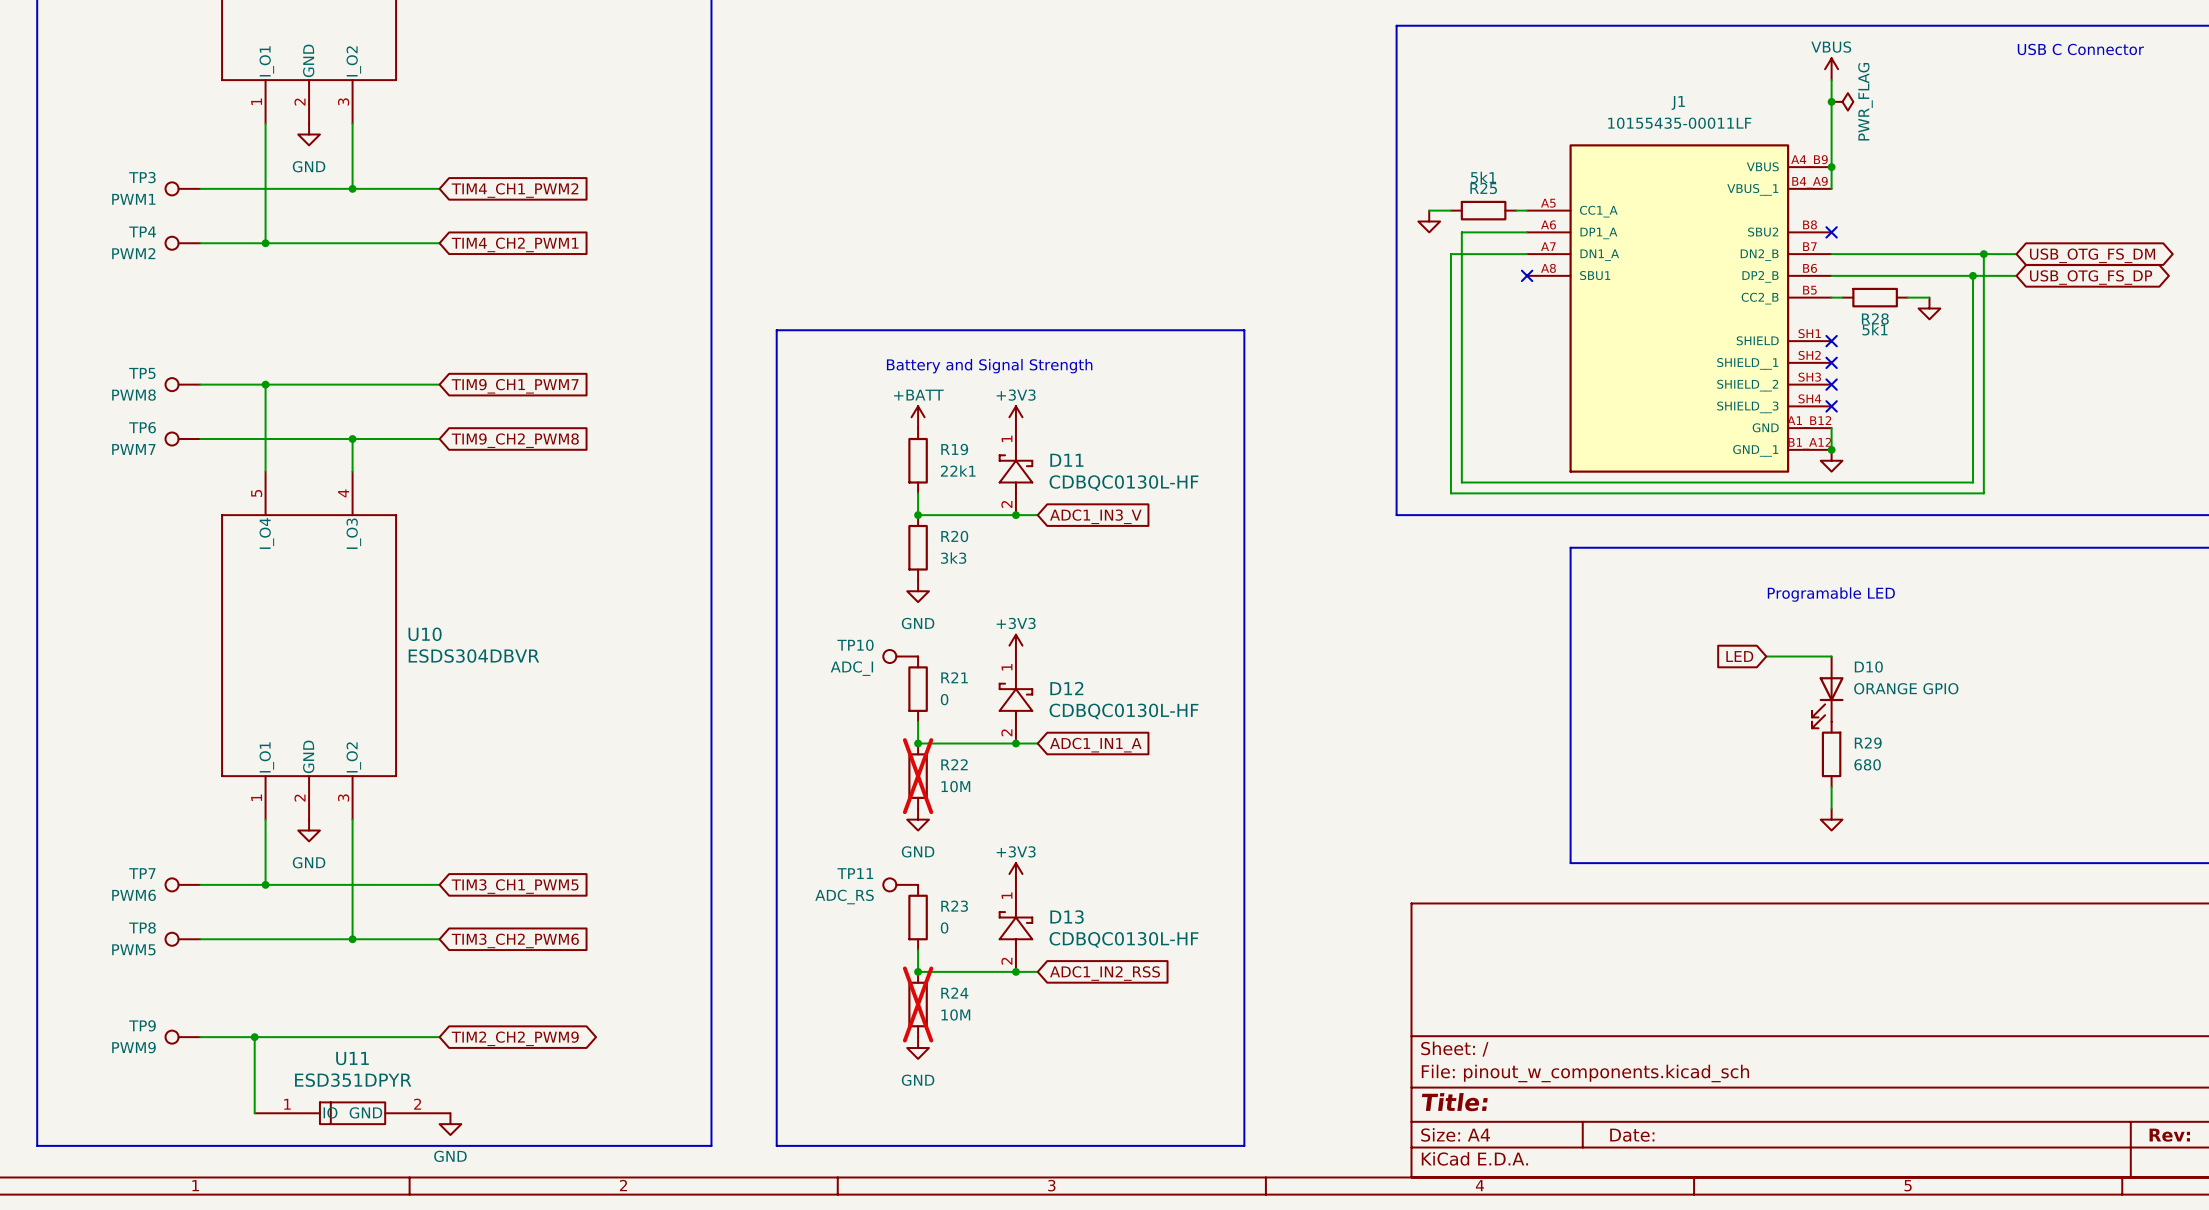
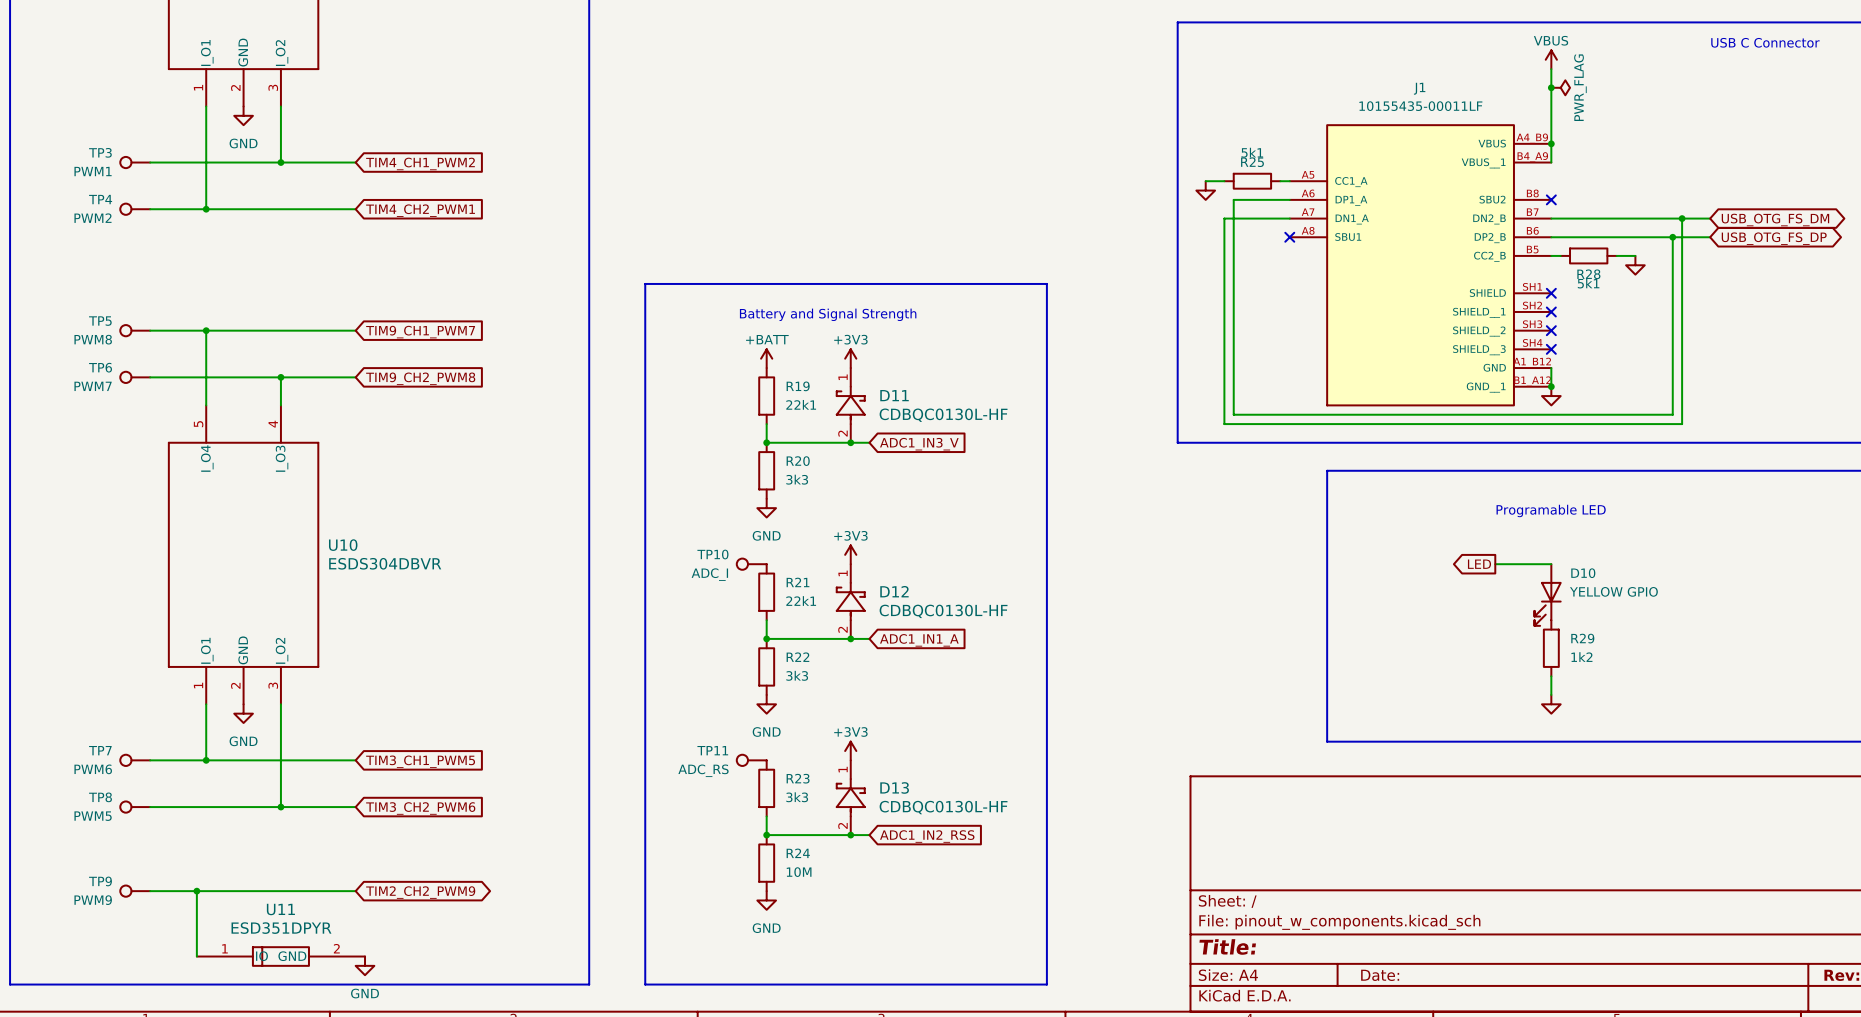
global label shape: input (1739, 656) -> output (1479, 564)
D10 value: ORANGE GPIO (1906, 688) -> YELLOW GPIO (1613, 591)
R21 value: 0 (944, 699) -> 22k1 (801, 601)
R29 value: 680 (1867, 764) -> 1k2 (1581, 657)
R22 do-not-place cross: (918, 776) -> none
R22 value: 10M (955, 786) -> 3k3 (797, 675)
R23 value: 0 (944, 927) -> 3k3 (797, 797)
R24 do-not-place cross: (918, 1004) -> none

